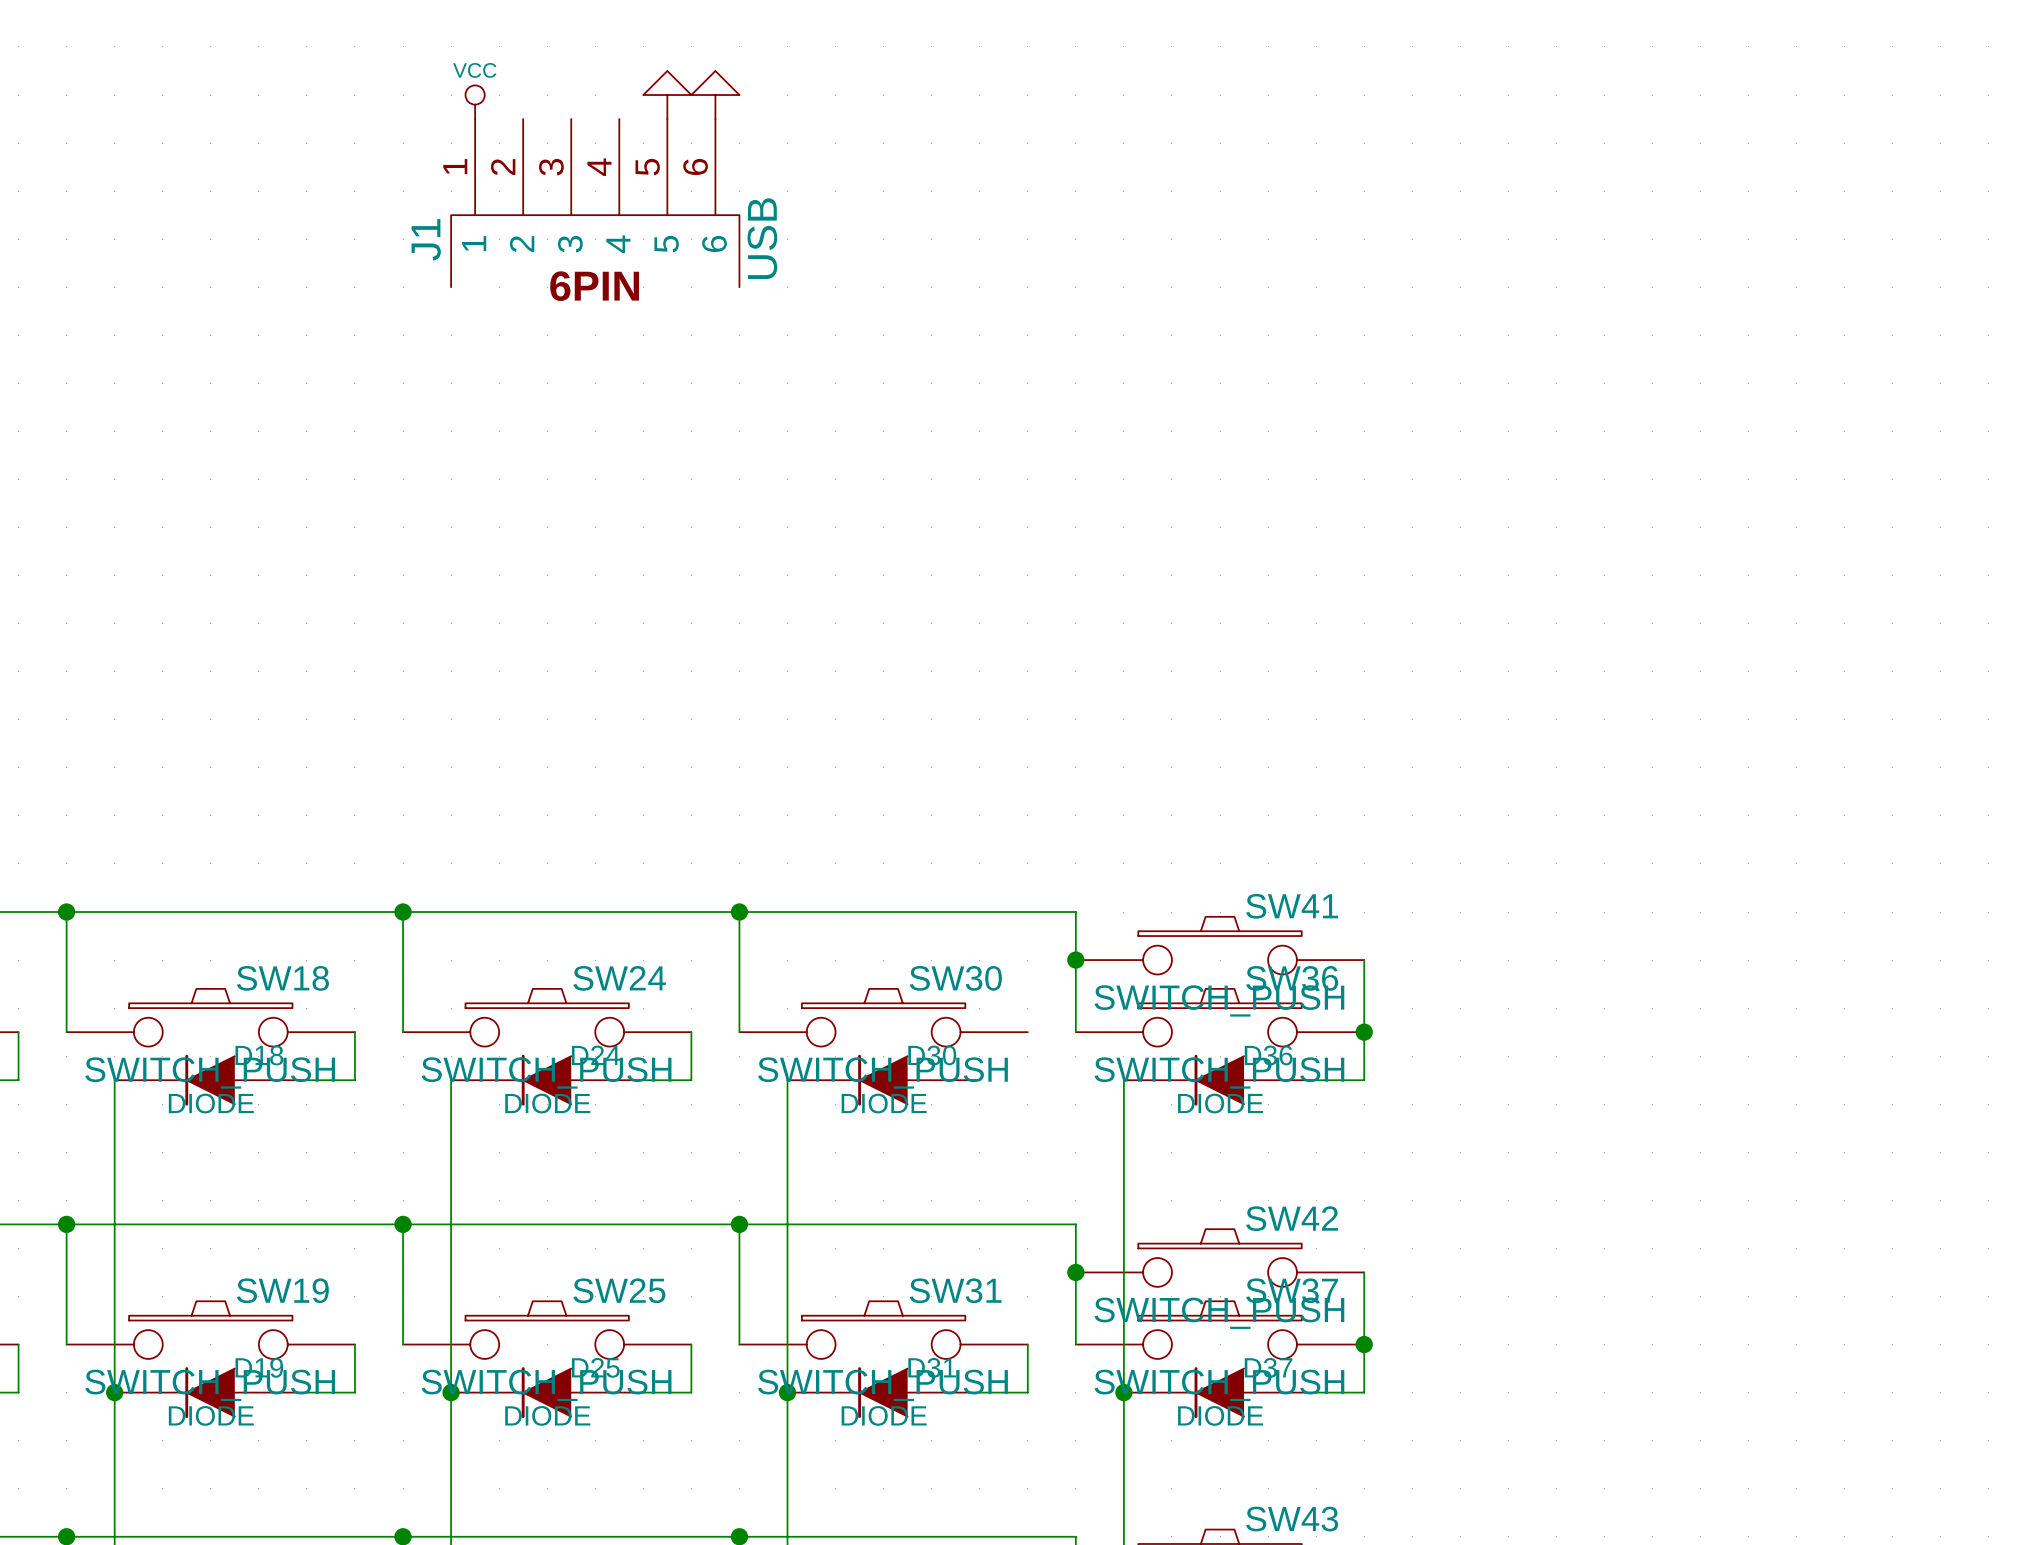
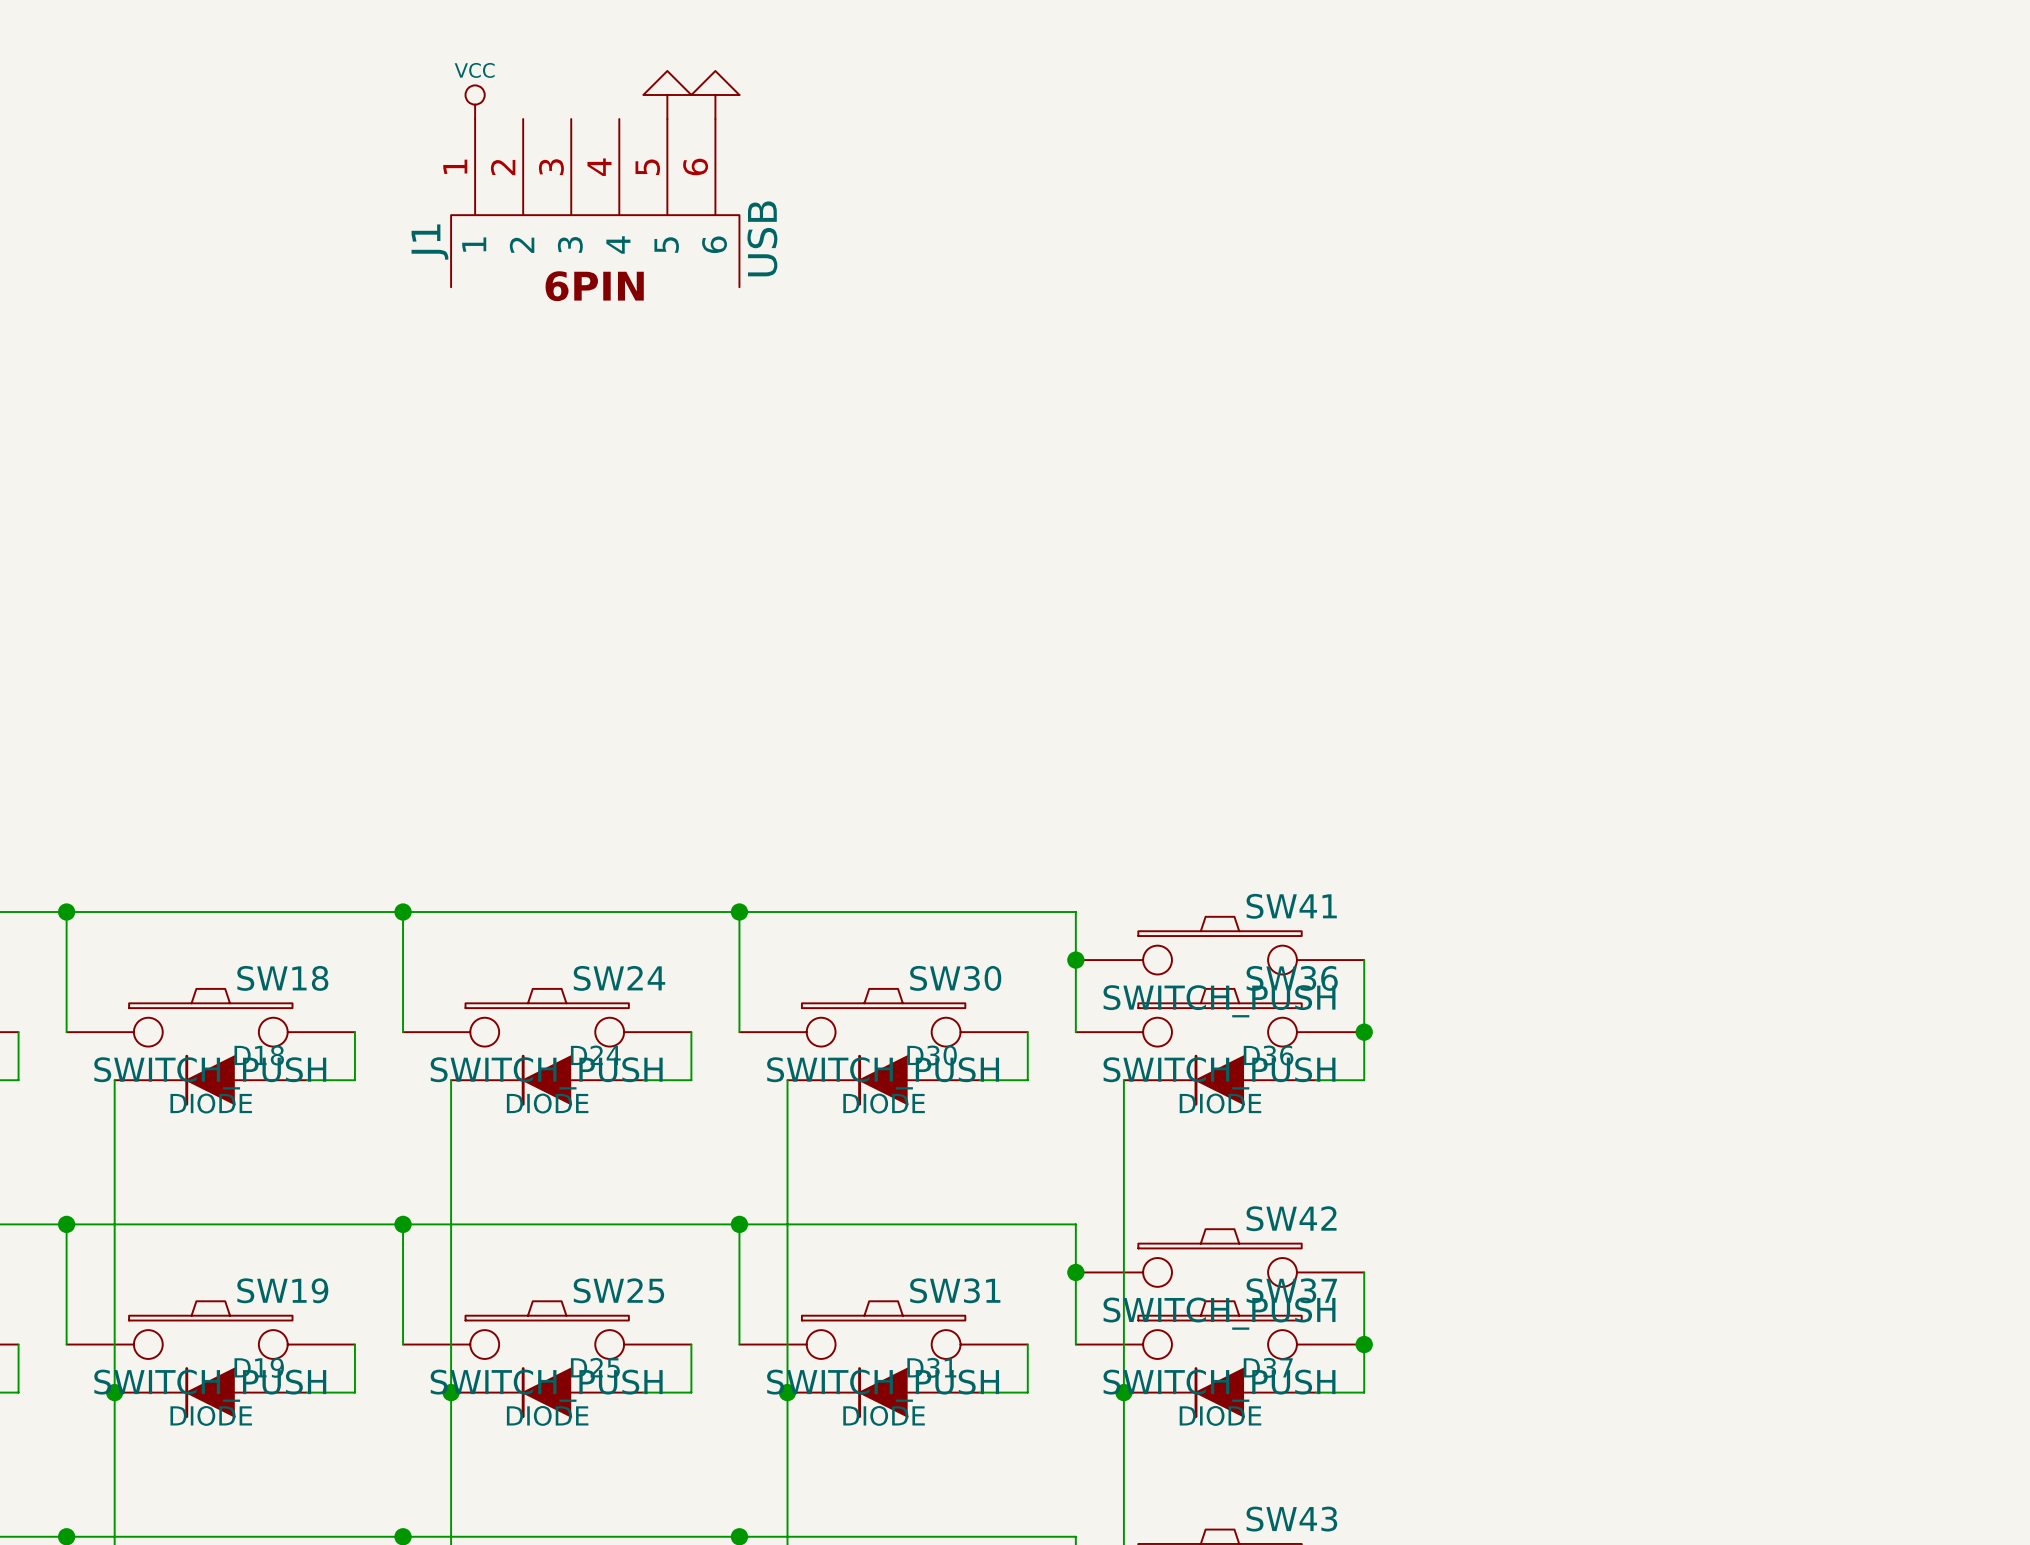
wire: none -> (1027, 1032) (1027, 1080) (979, 1080)

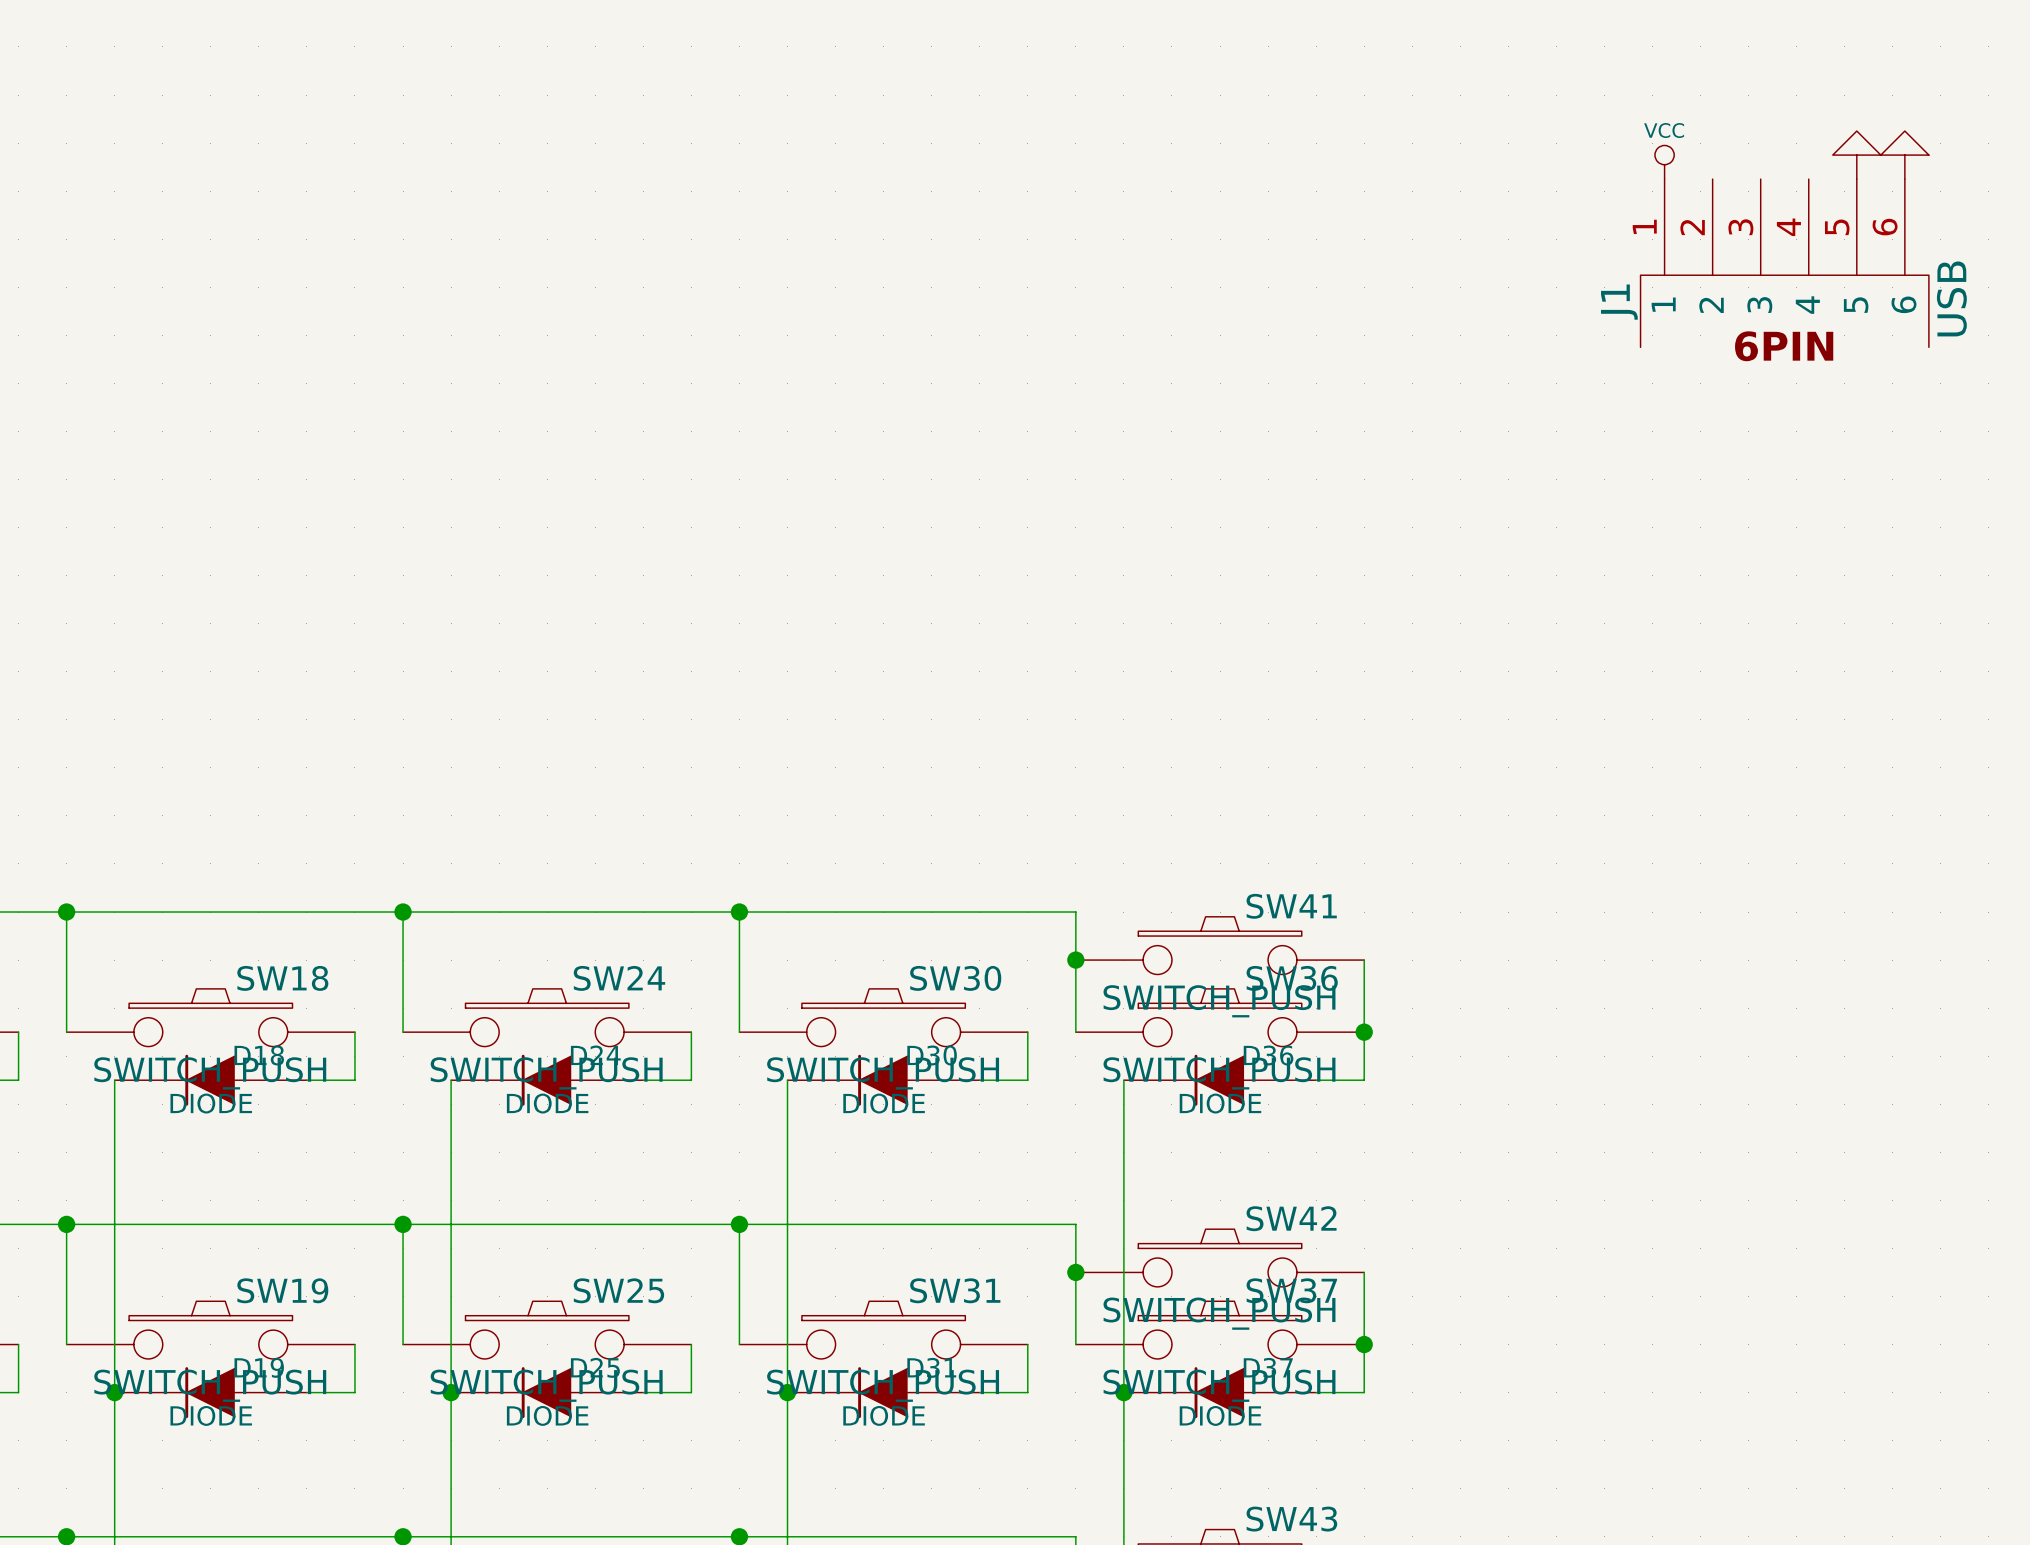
power symbol: (667, 95) -> none
power symbol: (715, 95) -> none
power symbol: VCC (475, 102) -> none
power symbol: none -> (1856, 155)
power symbol: none -> (1904, 155)
power symbol: none -> VCC (1664, 162)
J1 position: (595, 203) -> (1784, 263)

